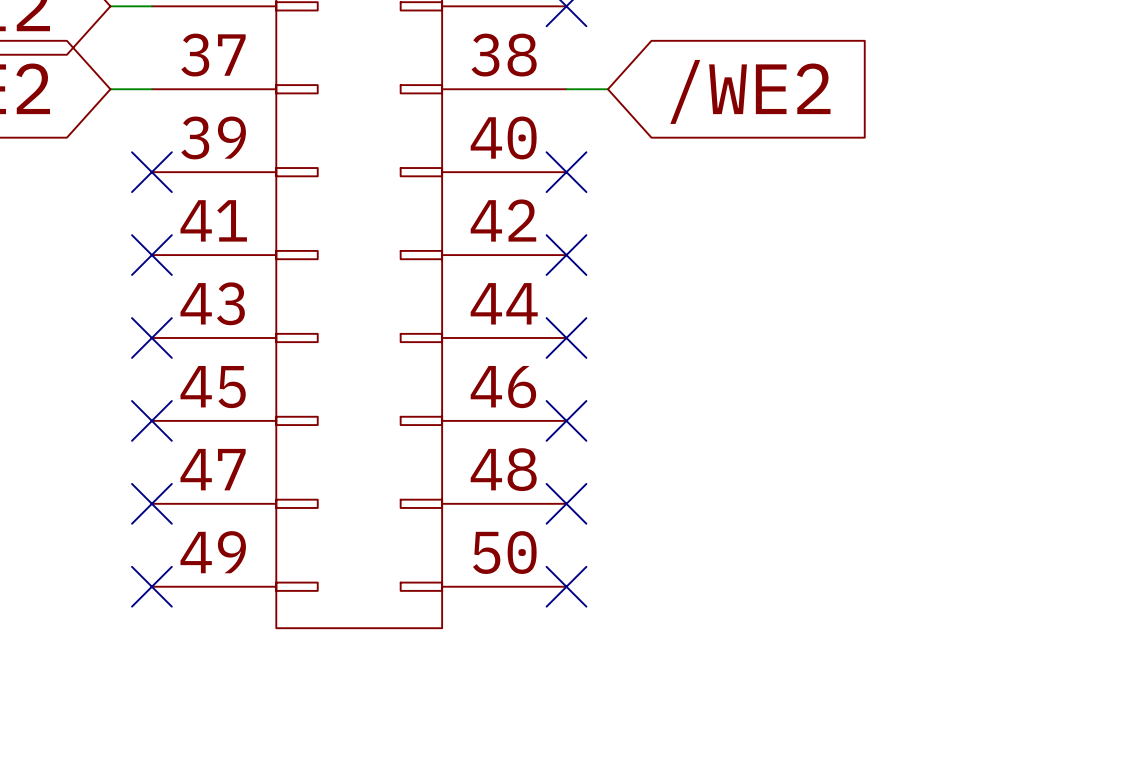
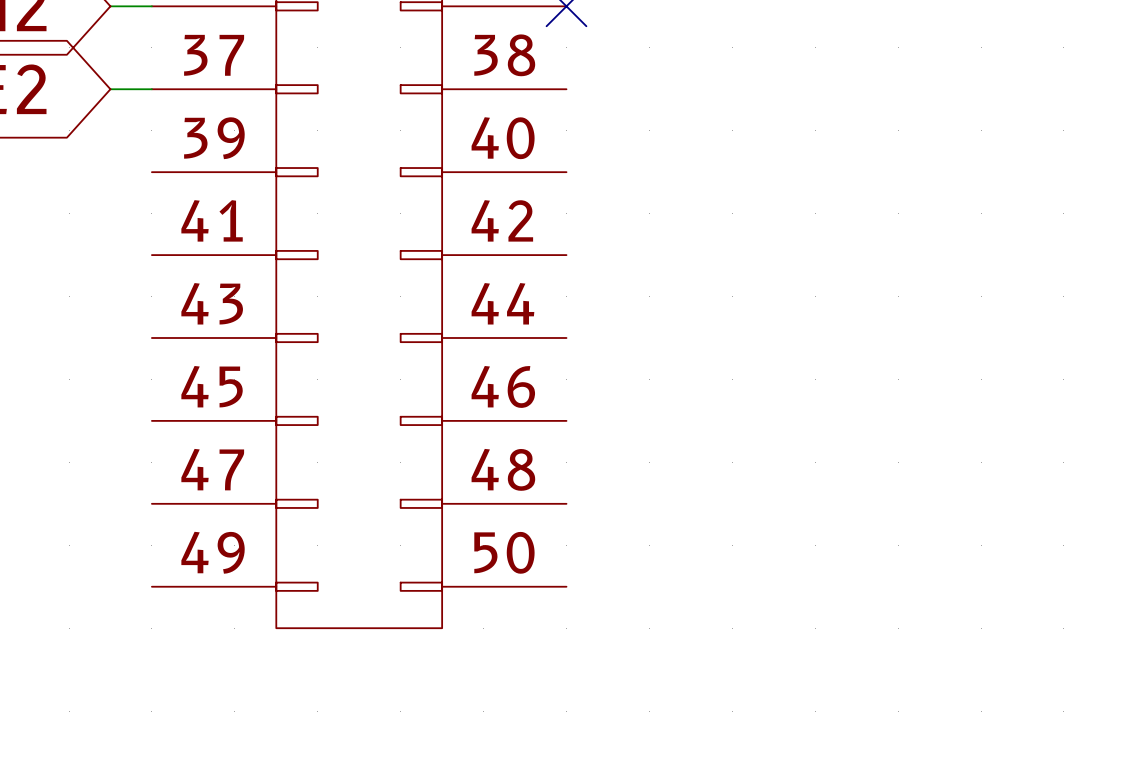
wire: (566, 89) (607, 89) -> none
global label: /WE2 (750, 91) -> none
no-connect mark: (151, 172) -> none
no-connect mark: (566, 172) -> none
no-connect mark: (151, 255) -> none
no-connect mark: (566, 255) -> none
no-connect mark: (151, 337) -> none
no-connect mark: (566, 337) -> none
no-connect mark: (151, 420) -> none
no-connect mark: (566, 420) -> none
no-connect mark: (151, 503) -> none
no-connect mark: (566, 503) -> none
no-connect mark: (151, 586) -> none
no-connect mark: (566, 586) -> none

